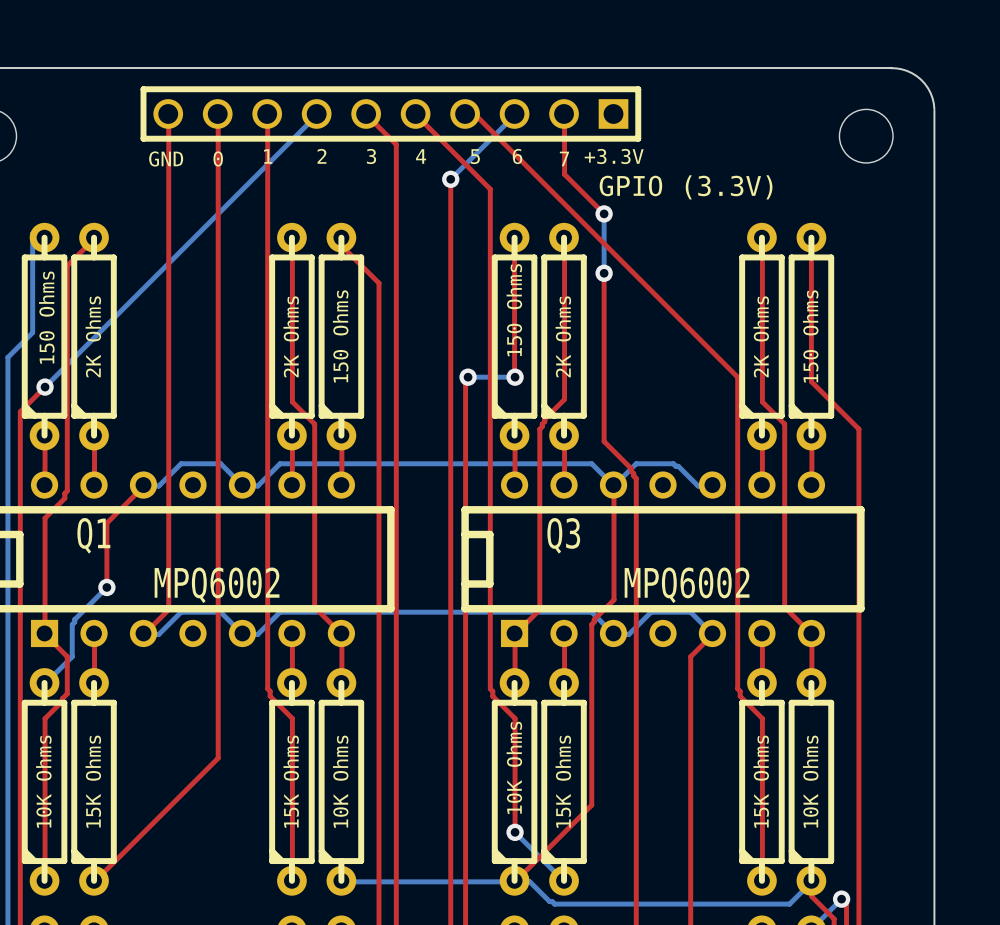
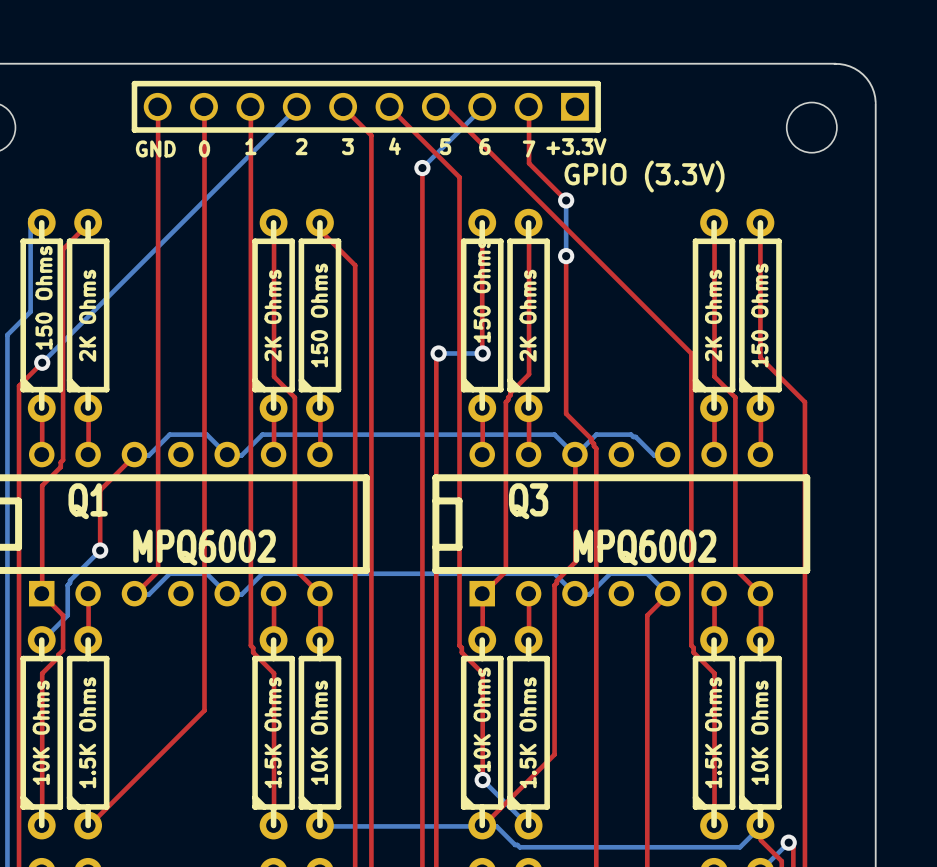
part value: 15K Ohms (93, 781) -> 1.5K Ohms (87, 732)
part value: 15K Ohms (291, 781) -> 1.5K Ohms (273, 732)
part value: 15K Ohms (563, 781) -> 1.5K Ohms (528, 732)
part value: 15K Ohms (761, 781) -> 1.5K Ohms (713, 732)

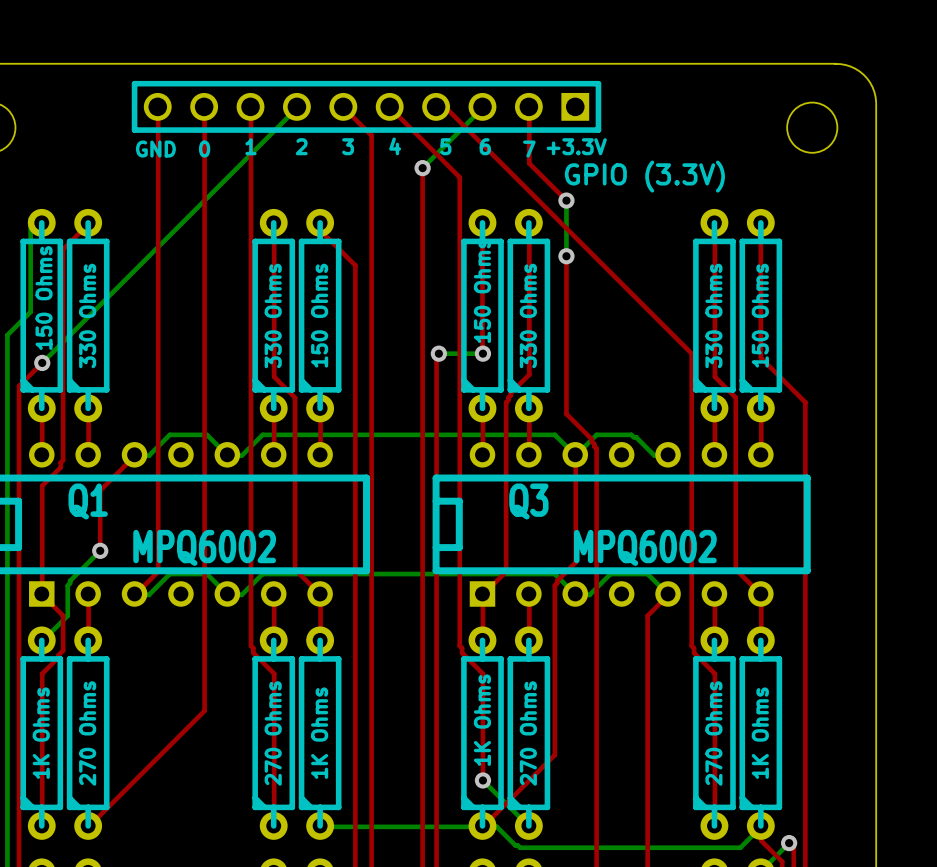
part value: 2K Ohms (87, 315) -> 330 Ohms (87, 315)
part value: 2K Ohms (273, 315) -> 330 Ohms (273, 315)
part value: 2K Ohms (528, 315) -> 330 Ohms (528, 315)
part value: 2K Ohms (713, 315) -> 330 Ohms (713, 315)
part value: 10K Ohms (482, 719) -> 1K Ohms (482, 720)
part value: 10K Ohms (41, 732) -> 1K Ohms (41, 733)
part value: 1.5K Ohms (87, 732) -> 270 Ohms (87, 733)
part value: 1.5K Ohms (273, 732) -> 270 Ohms (273, 733)
part value: 10K Ohms (319, 732) -> 1K Ohms (319, 733)
part value: 1.5K Ohms (528, 732) -> 270 Ohms (528, 733)
part value: 1.5K Ohms (713, 732) -> 270 Ohms (713, 733)
part value: 10K Ohms (759, 732) -> 1K Ohms (760, 733)

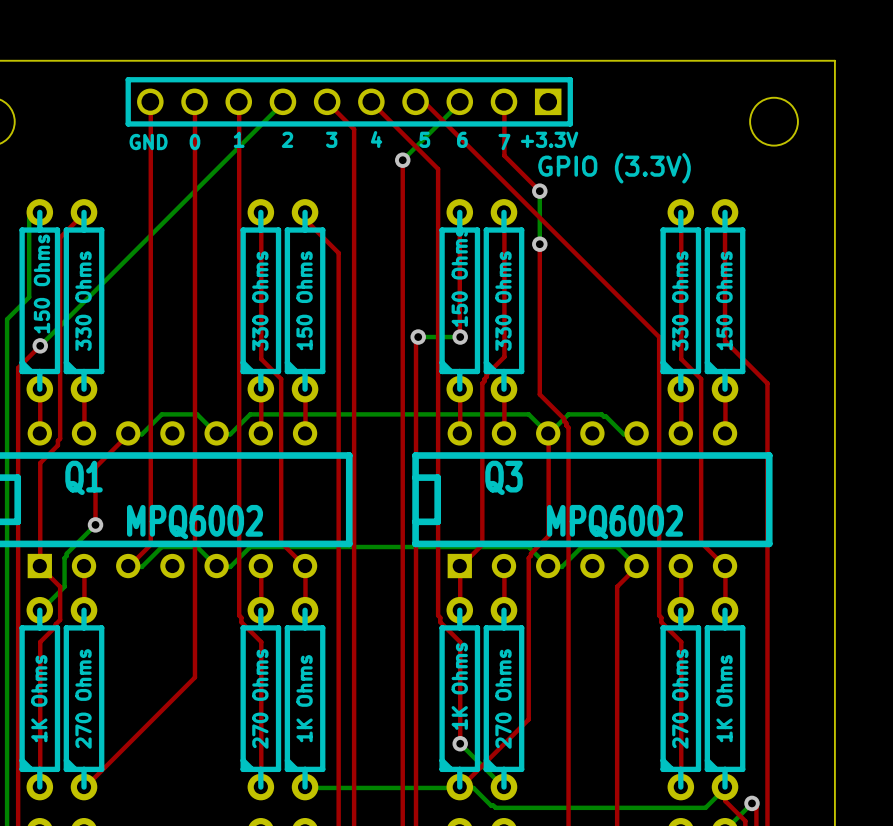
board edge: (835, 63) (850, 66) (863, 74) (872, 87) (876, 102) -> none
board edge: none -> (796, 60) (834, 60) (834, 98)

